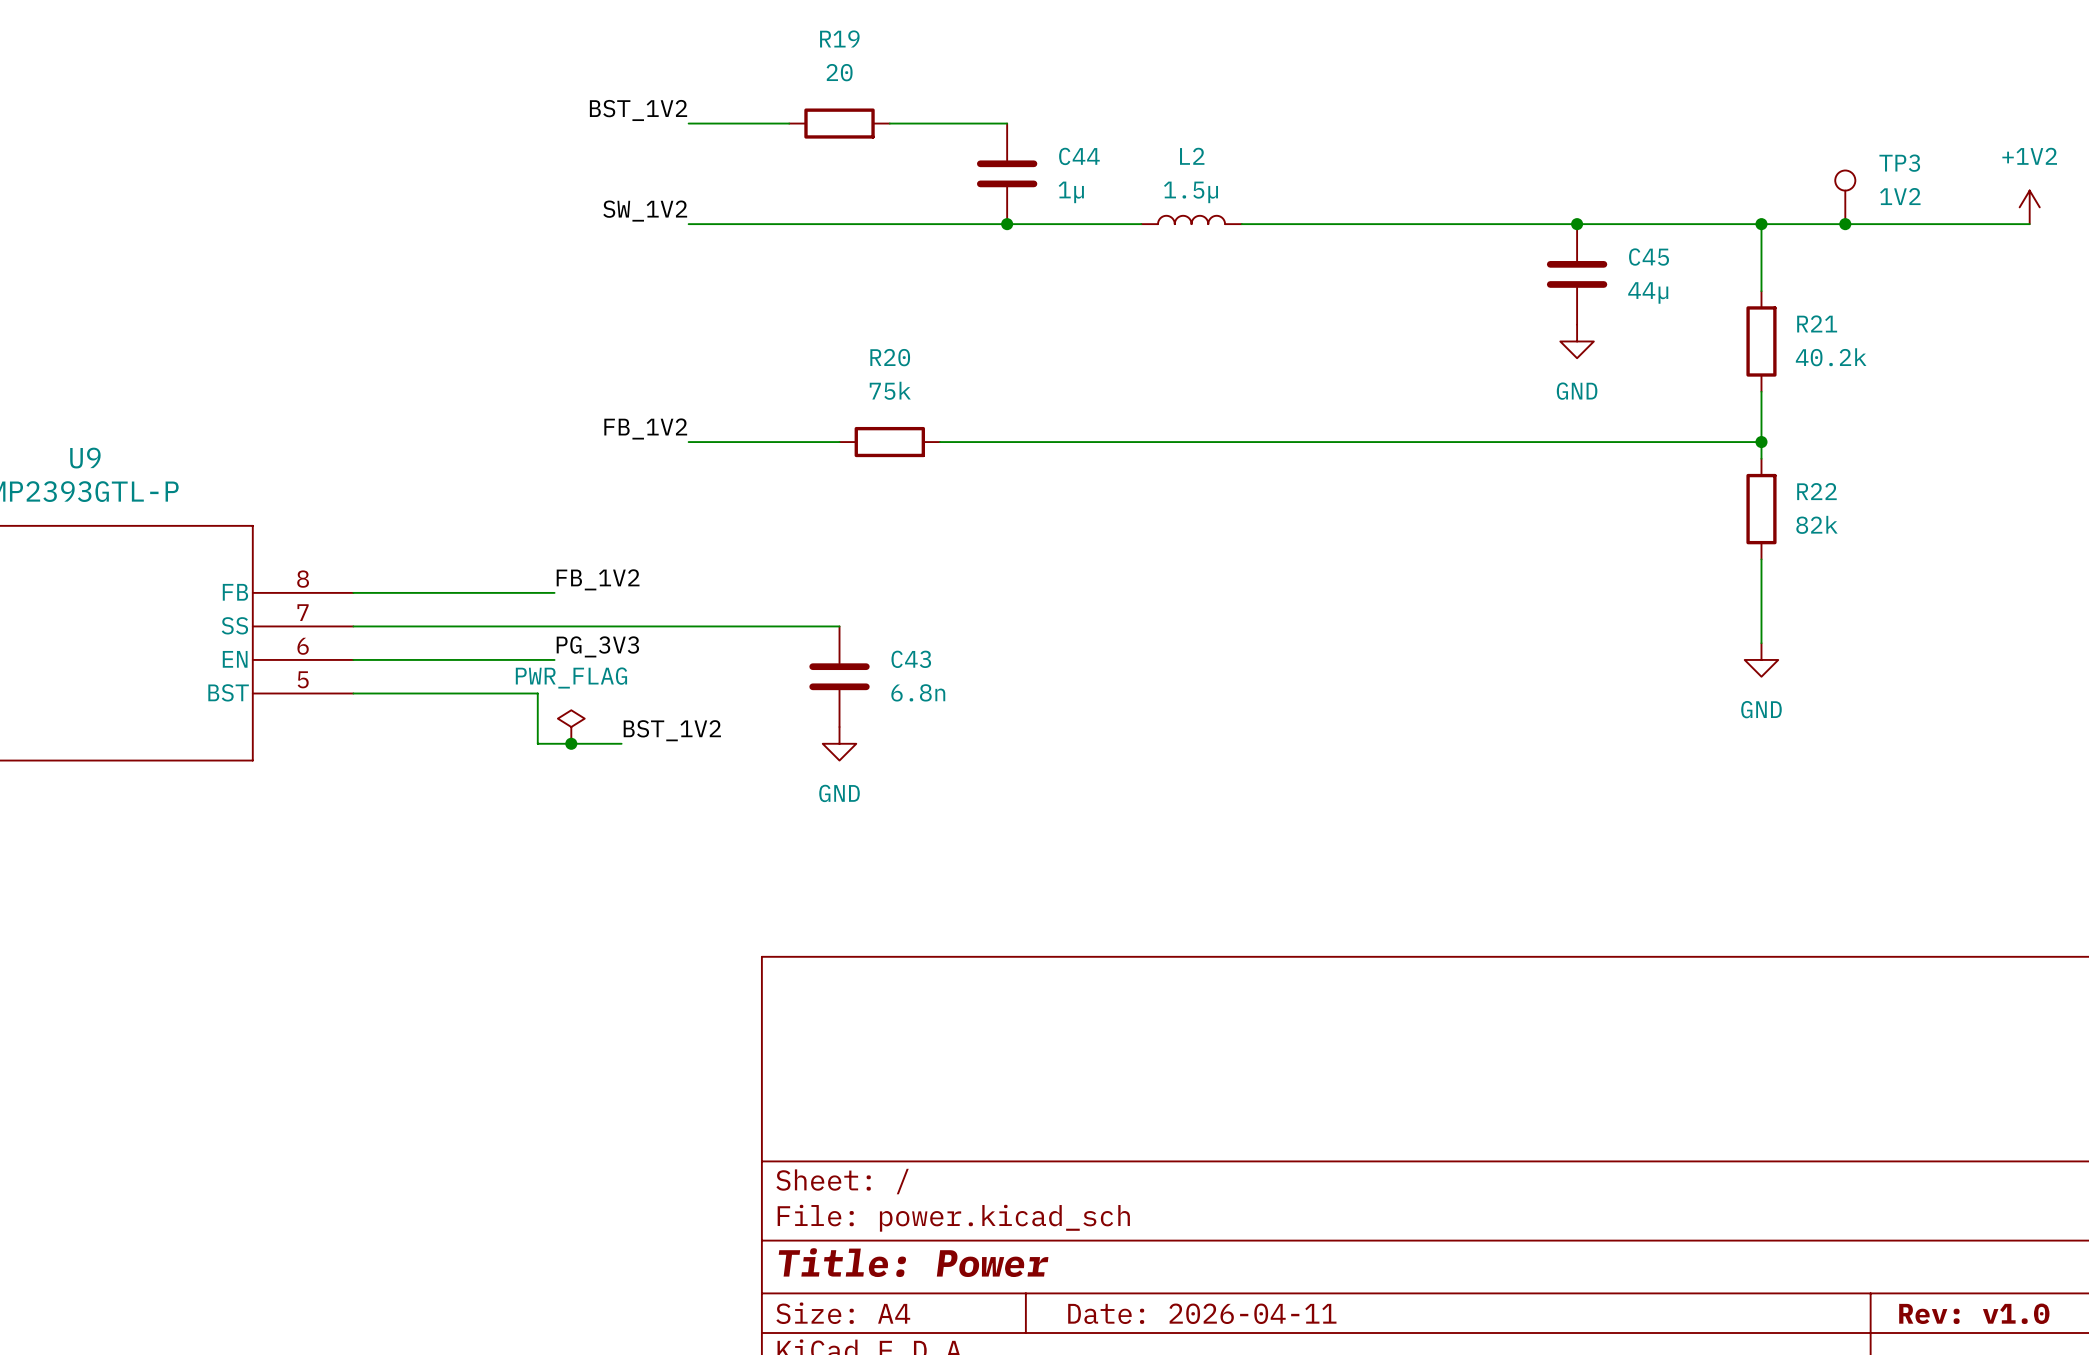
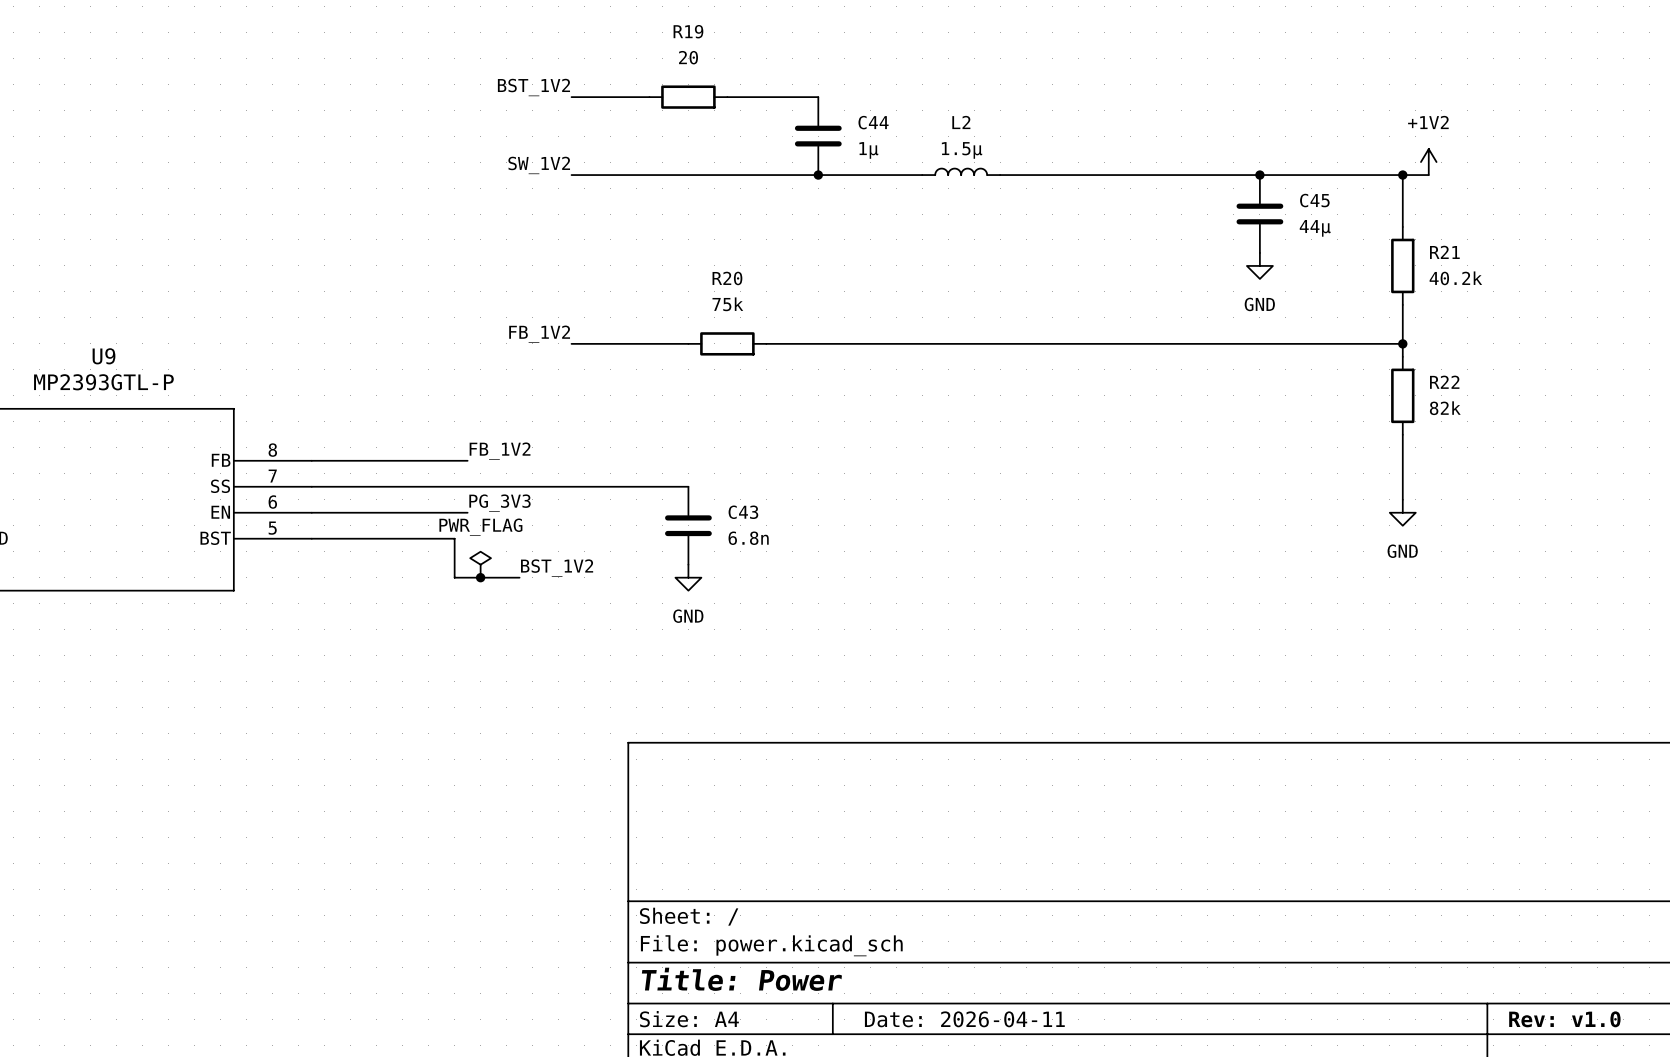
TP3: 1V2 (1845, 197) -> none
power symbol position: +1V2 (2029, 207) -> +1V2 (1428, 162)
wire: (1795, 224) (2029, 224) -> none
junction: (1845, 224) -> none

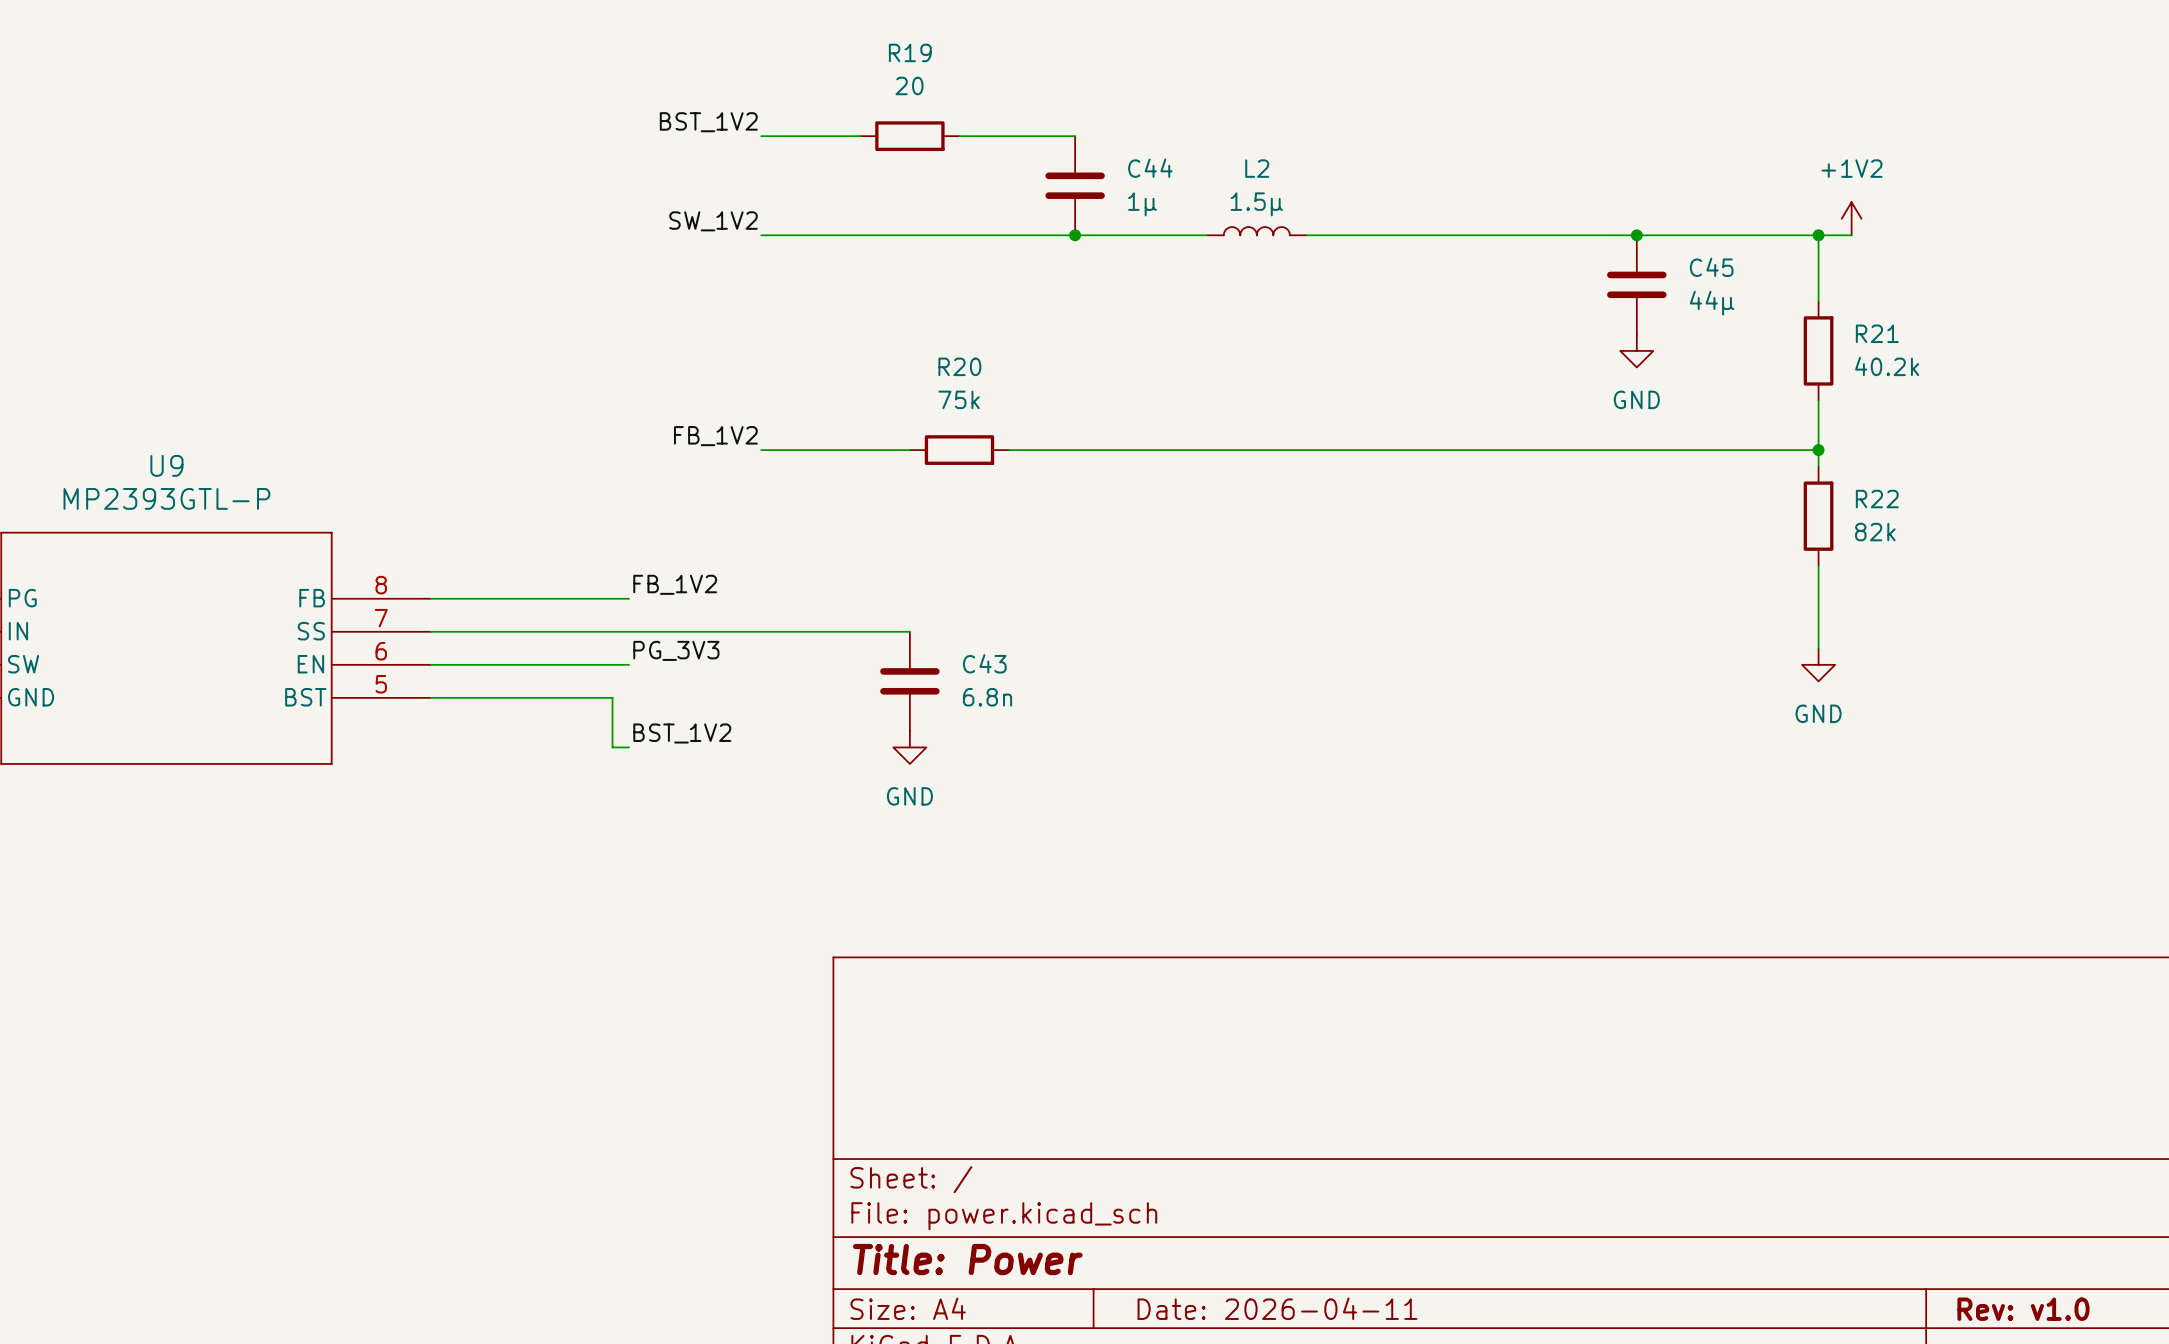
power symbol: PWR_FLAG (480, 564) -> none
label position: BST_1V2 (557, 568) -> BST_1V2 (682, 733)
wire: (467, 577) (519, 577) -> none
junction: (480, 577) -> none

